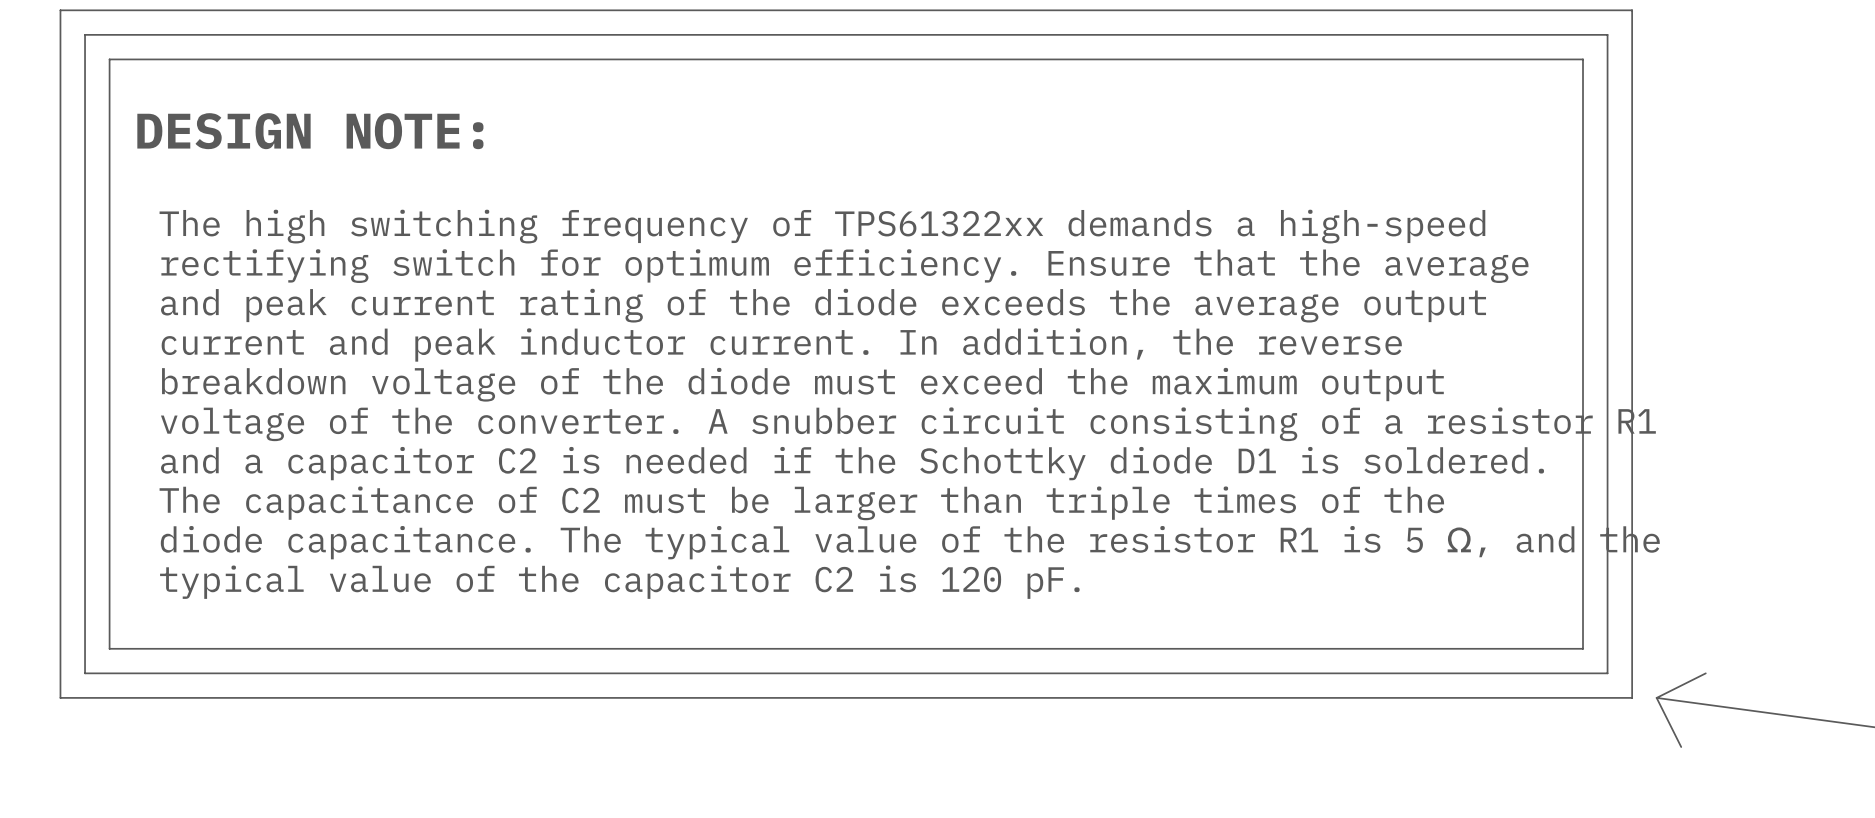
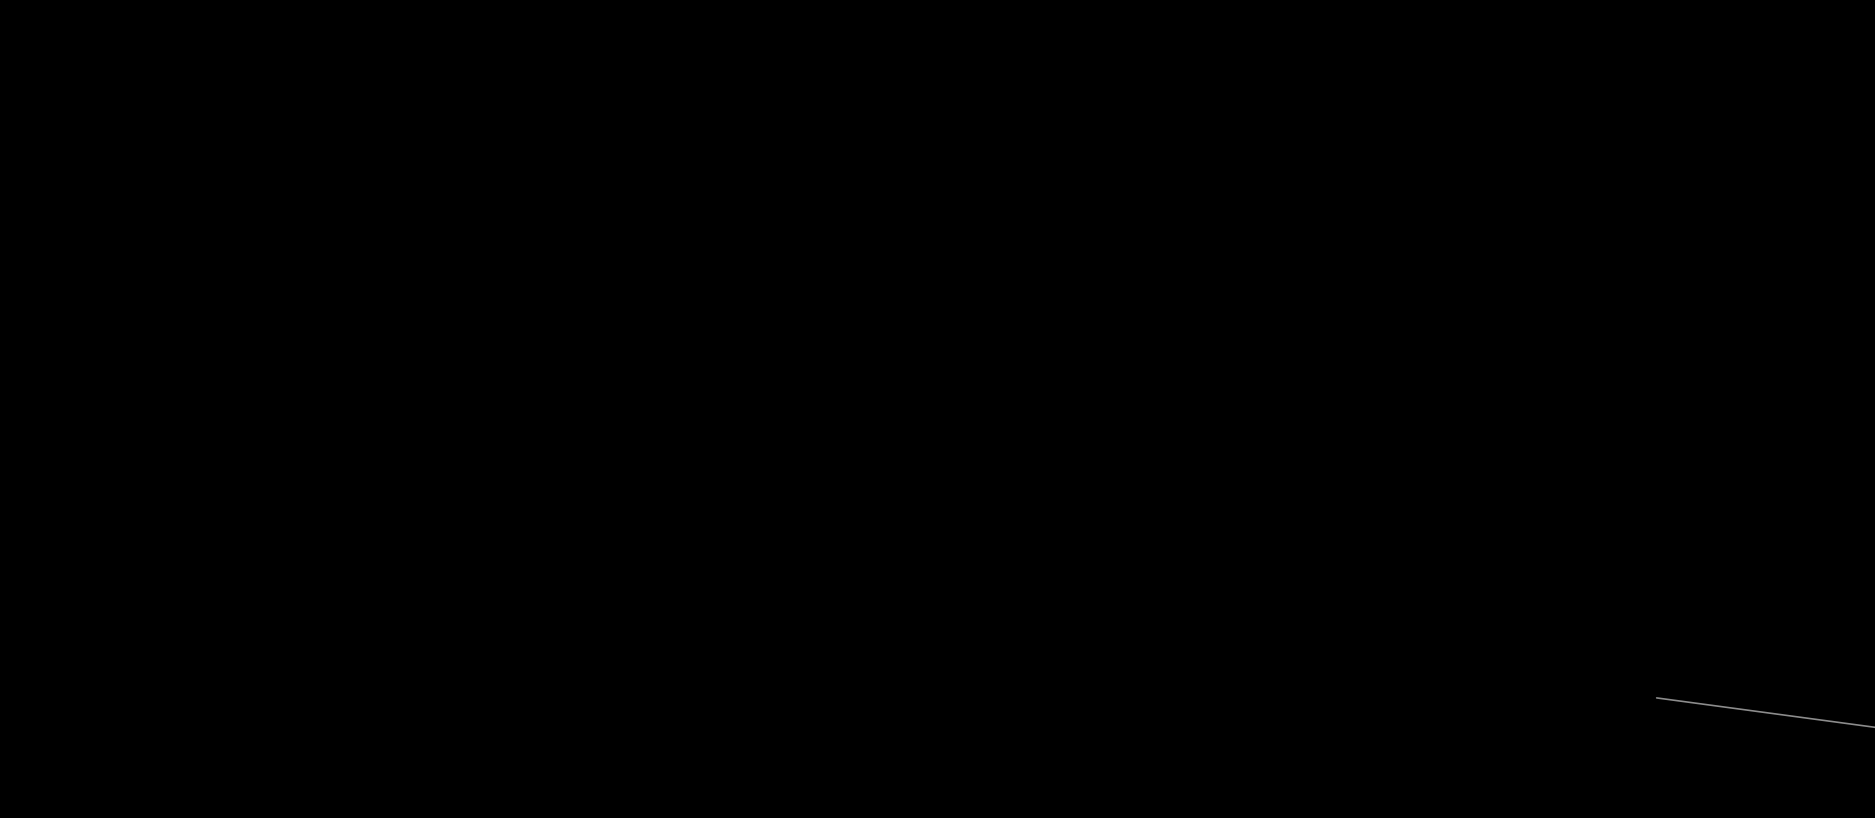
line: (60, 10) (60, 697) (1632, 697) (1632, 10) (60, 10) -> none
line: (85, 34) (85, 673) (1607, 673) (1607, 34) (85, 34) -> none
line: (109, 59) (1583, 59) (1583, 648) (109, 648) (109, 59) -> none
text: DESIGN NOTE: (310, 131) -> none
text: The high switching frequency of TPS61322xx demands a high-speed (822, 226) -> none
text: rectifying switch for optimum efficiency. Ensure that the average (844, 266) -> none
text: and peak current rating of the diode exceeds the average output (823, 305) -> none
text: current and peak inductor current. In addition, the reverse (781, 344) -> none
text: breakdown voltage of the diode must exceed the maximum output (802, 384) -> none
text: voltage of the converter. A snubber circuit consisting of a resistor R1 (908, 424) -> none
text: and a capacitor C2 is needed if the Schottky diode D1 is soldered. (852, 463) -> none
text: The capacitance of C2 must be larger than triple times of the (801, 503) -> none
text: diode capacitance. The typical value of the resistor R1 is 5 Ω, and the (910, 542) -> none
text: typical value of the capacitor C2 is 120 pF. (619, 582) -> none
line: (1705, 673) (1656, 697) (1681, 747) -> none

